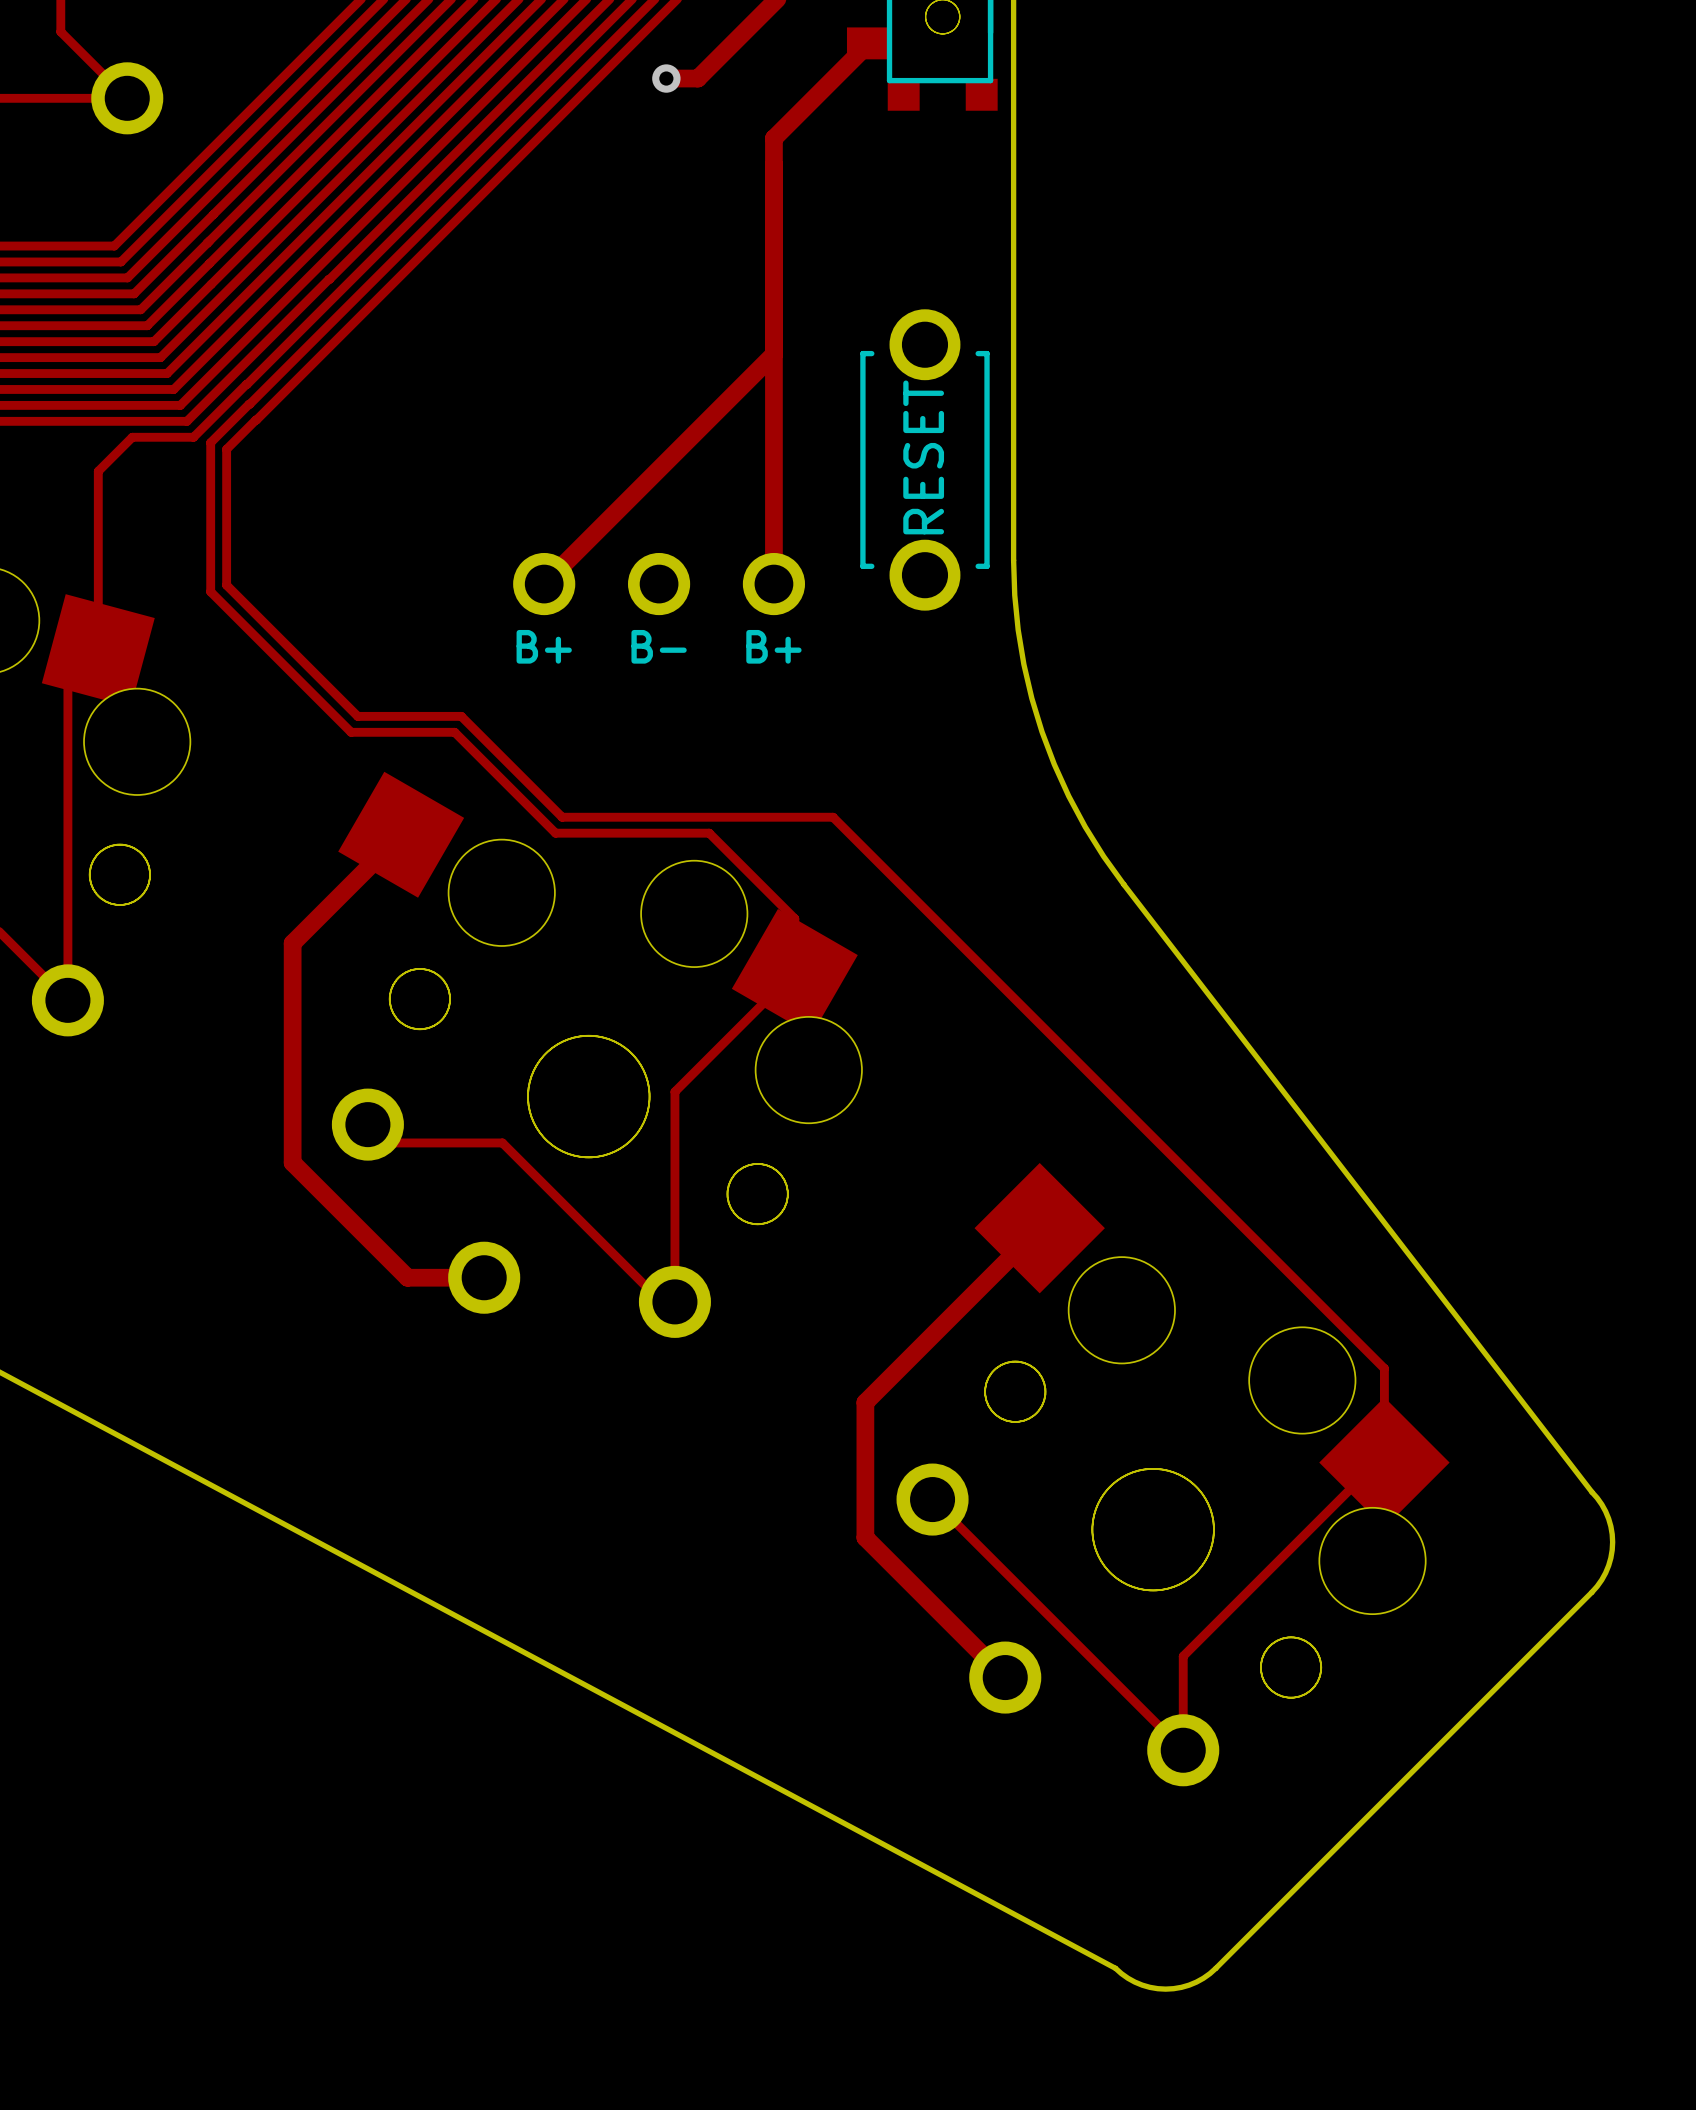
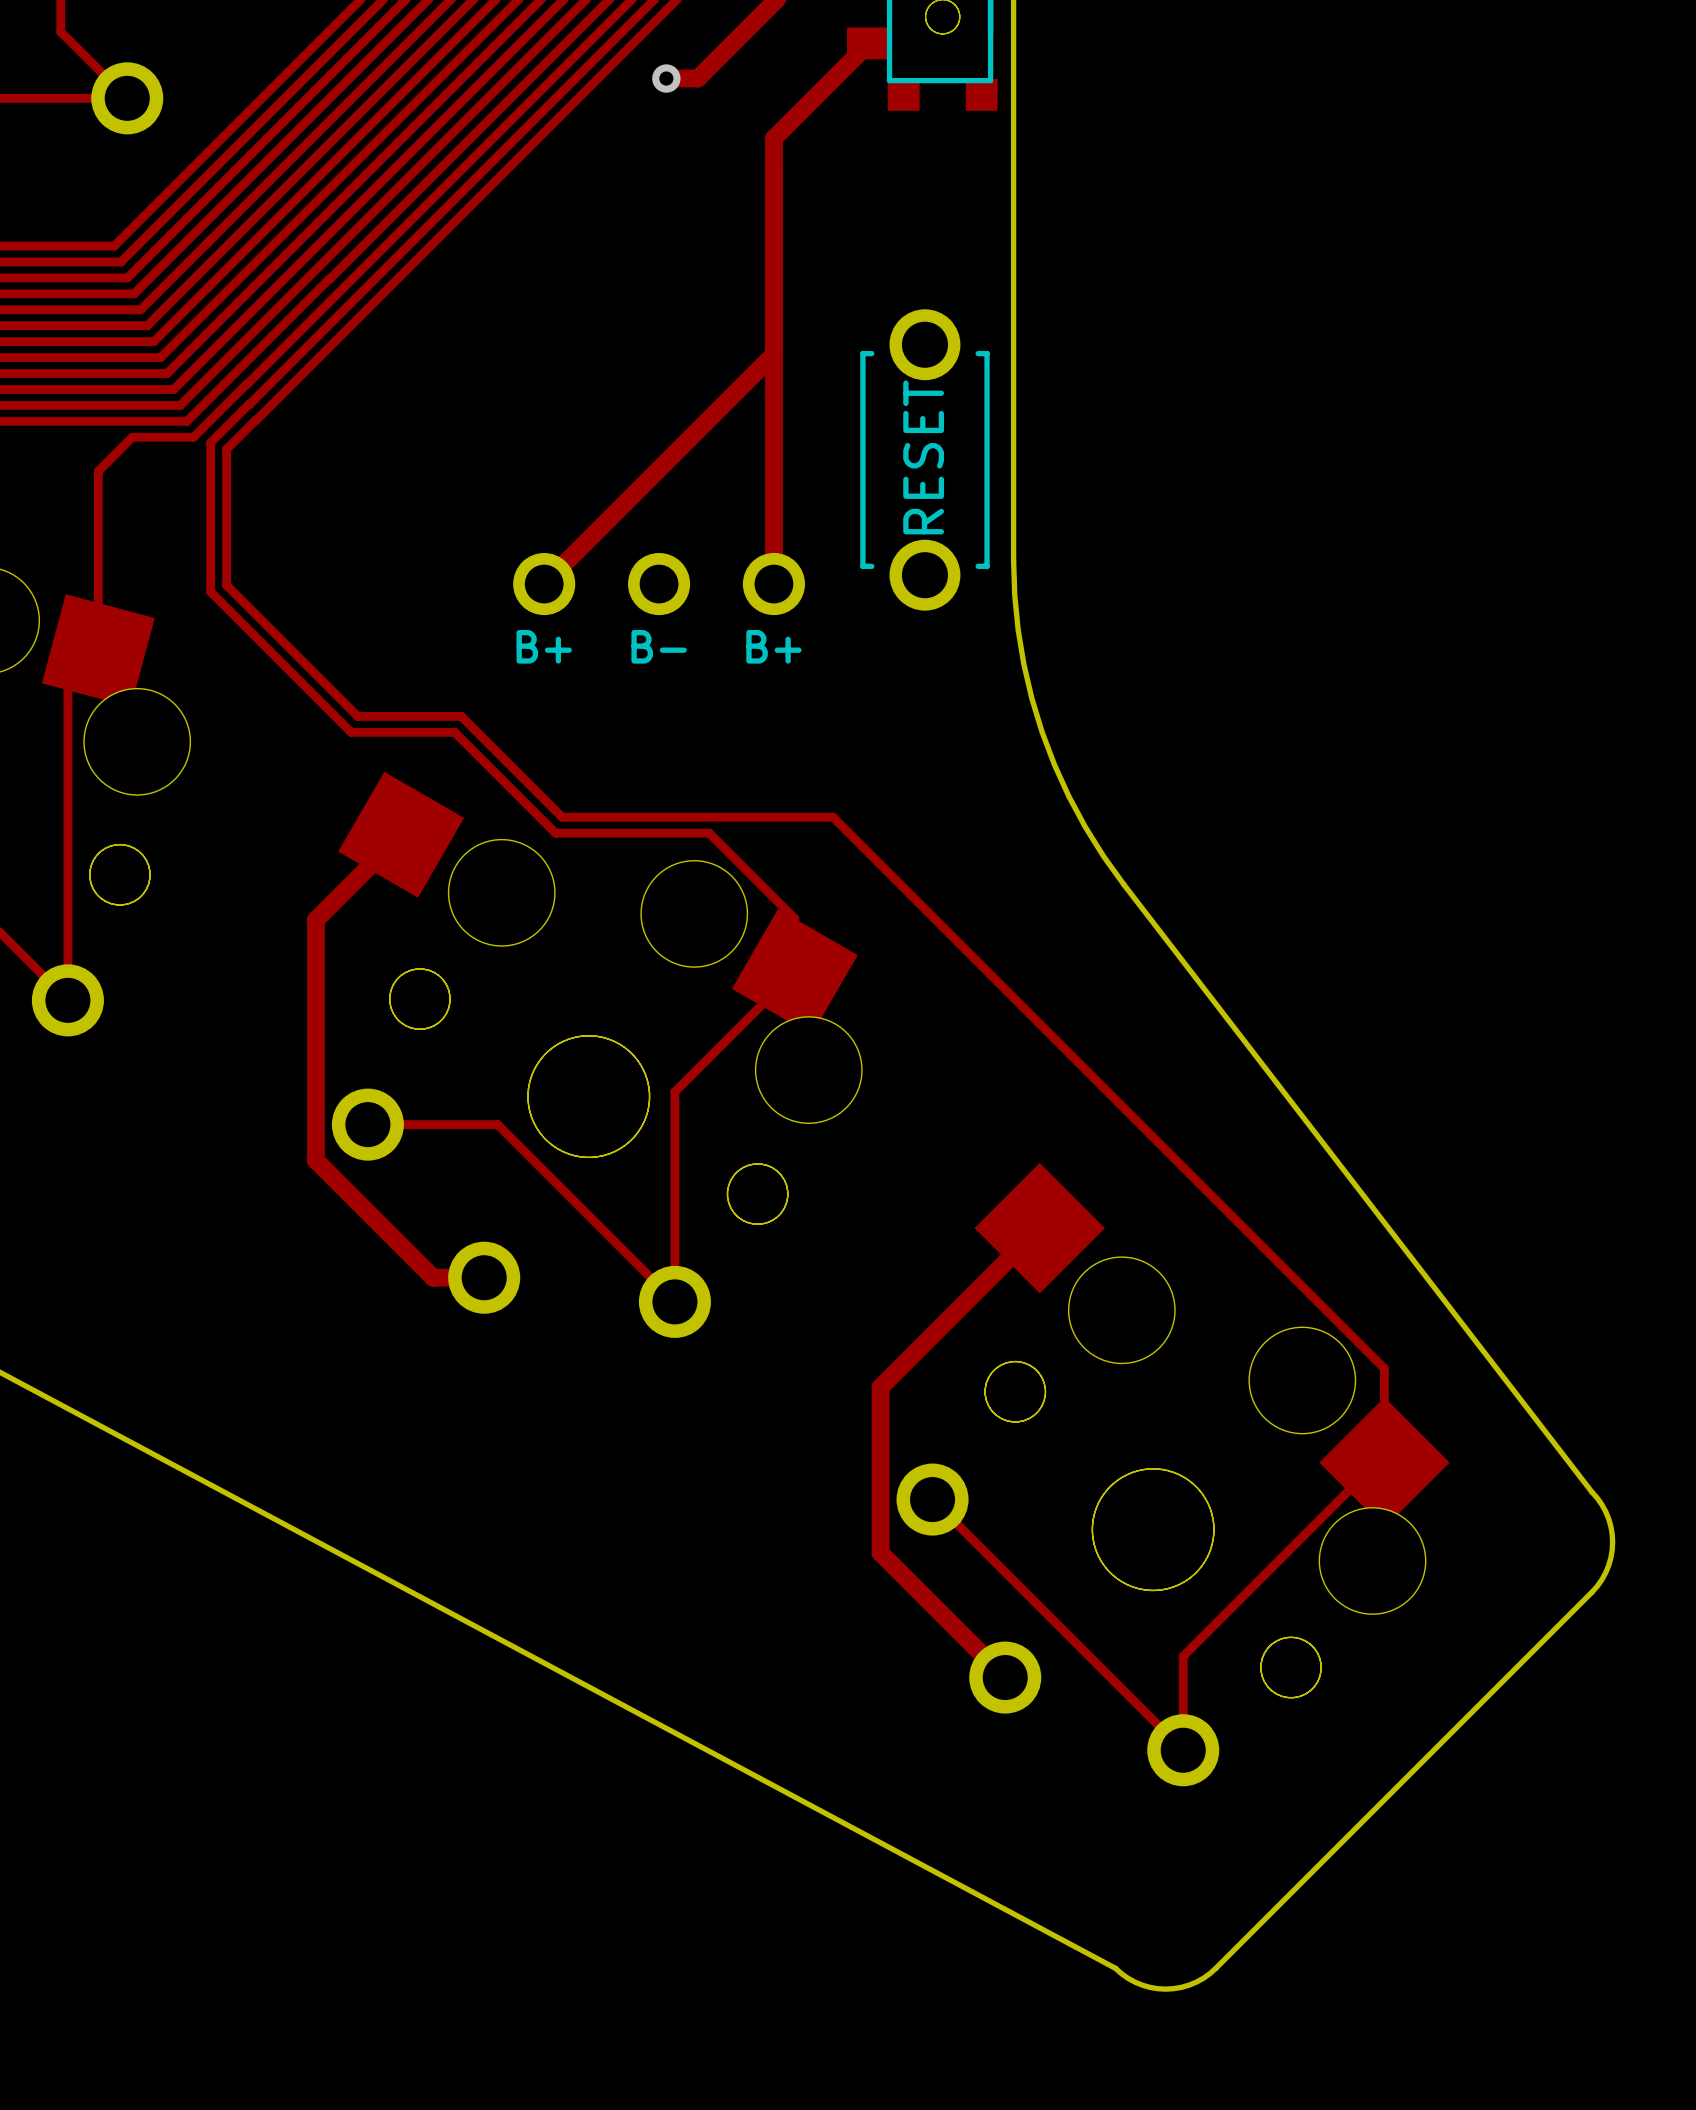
track: (315, 919) (292, 943) (292, 1162) (407, 1277) (433, 1277) -> (315, 919) (315, 1160) (433, 1277)
track: (367, 1124) (386, 1142) (502, 1142) (661, 1301) (674, 1301) -> (367, 1124) (497, 1124) (674, 1301)
track: (880, 1387) (865, 1402) (865, 1537) (880, 1552) -> (880, 1387) (880, 1552)

